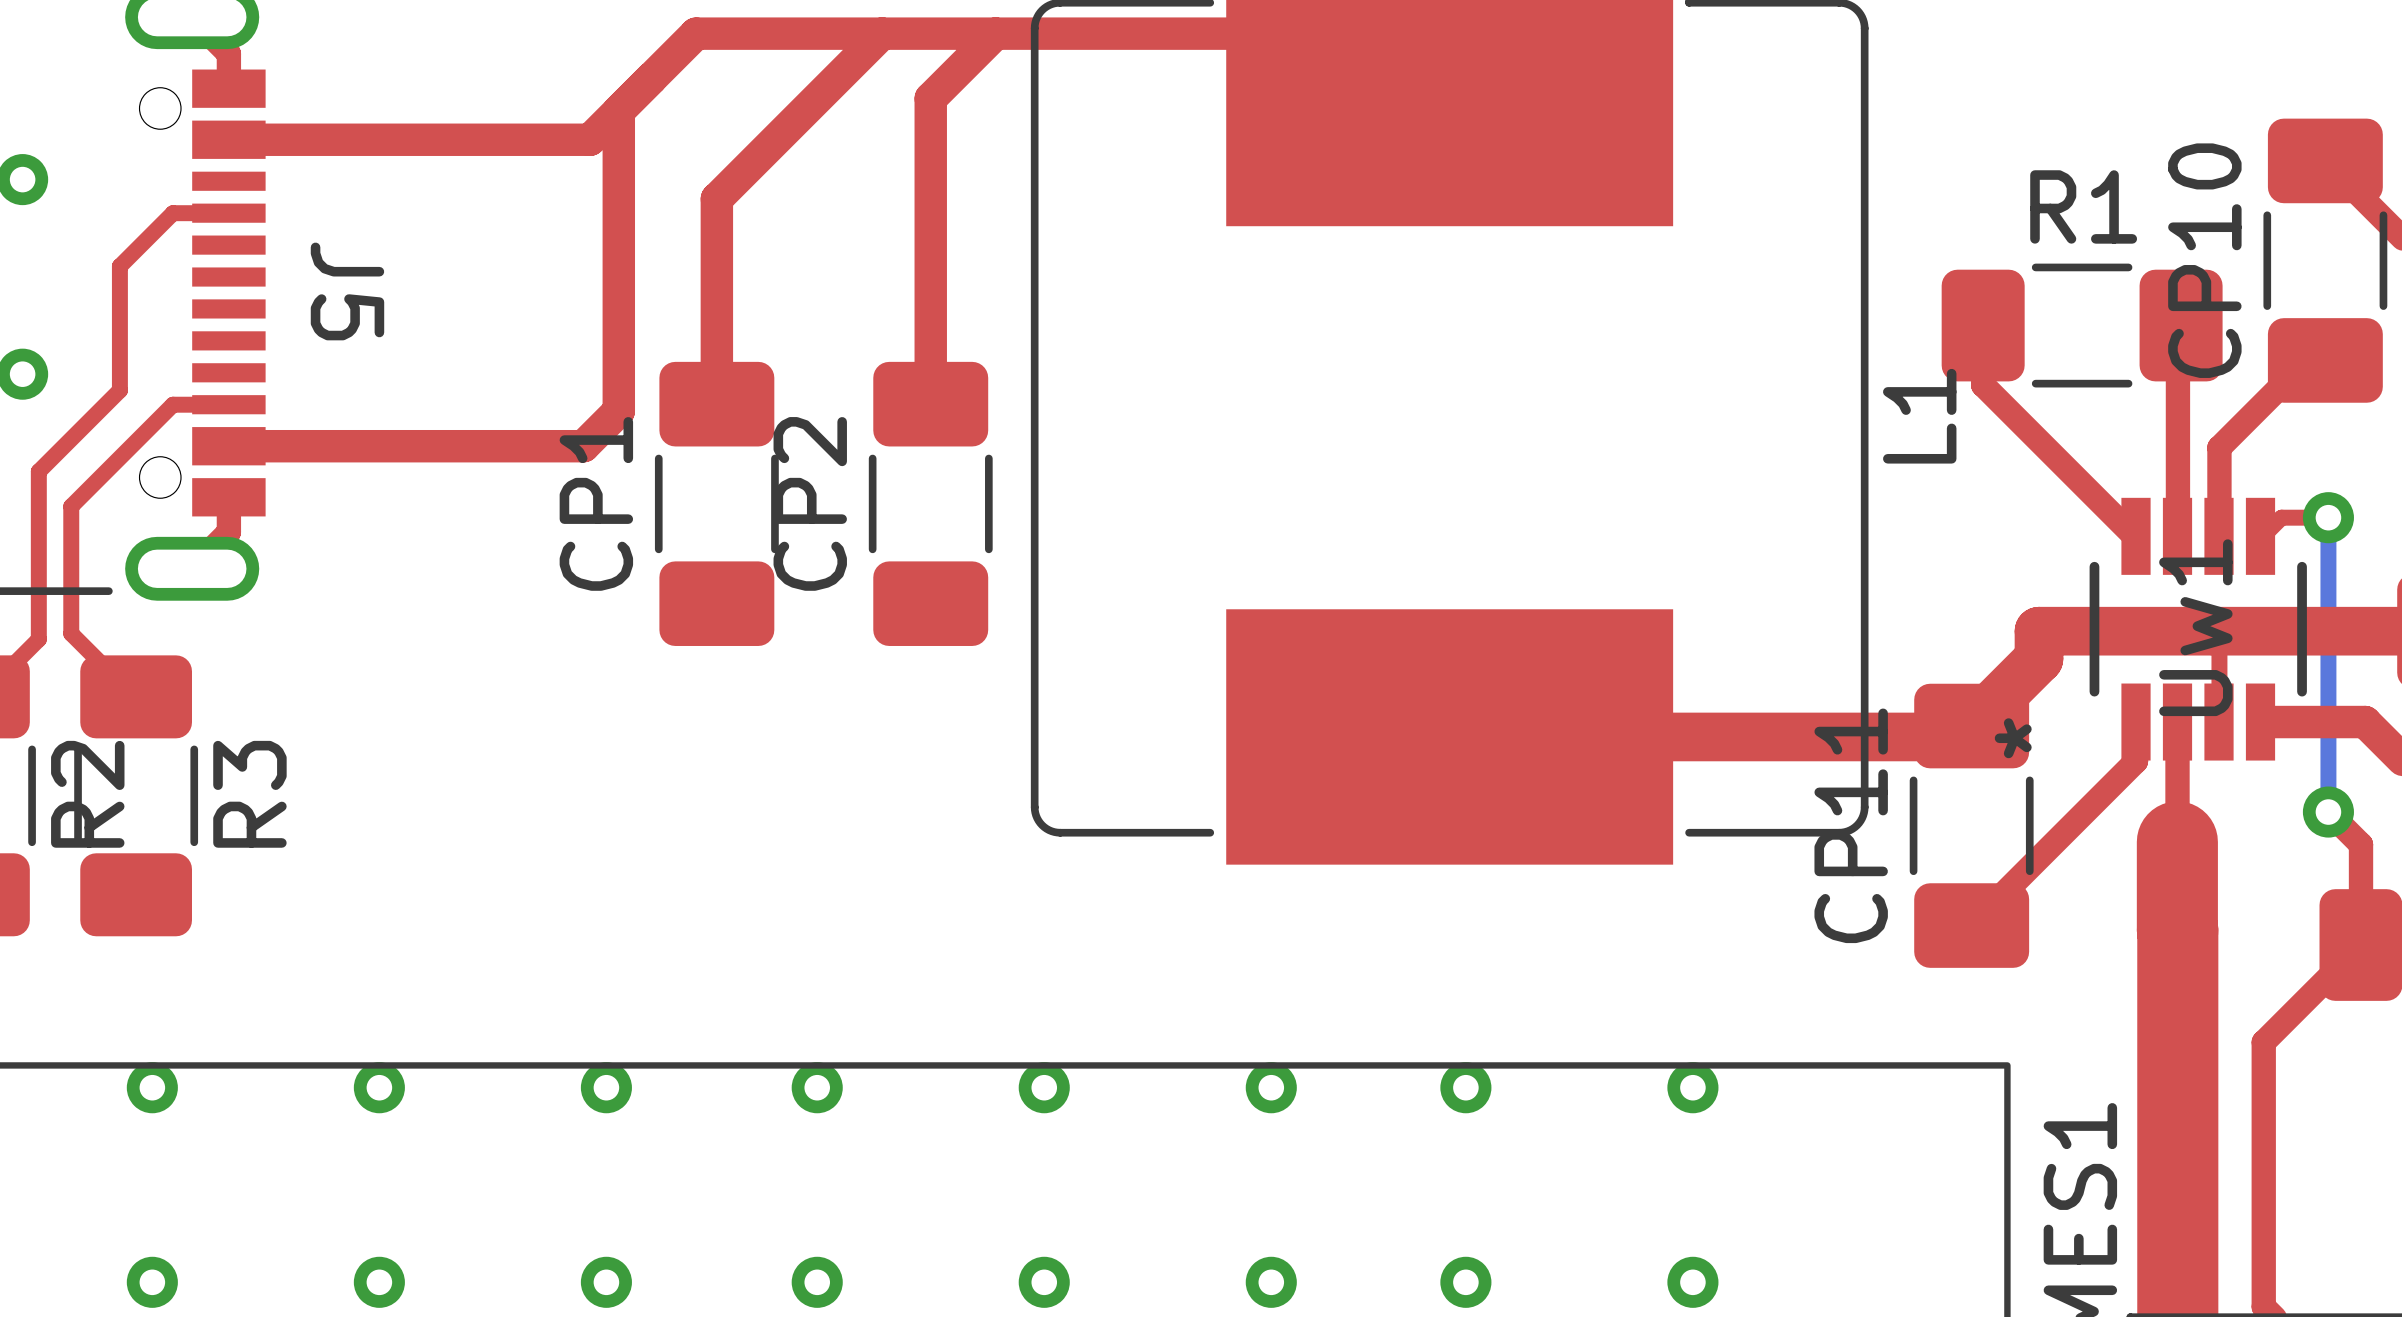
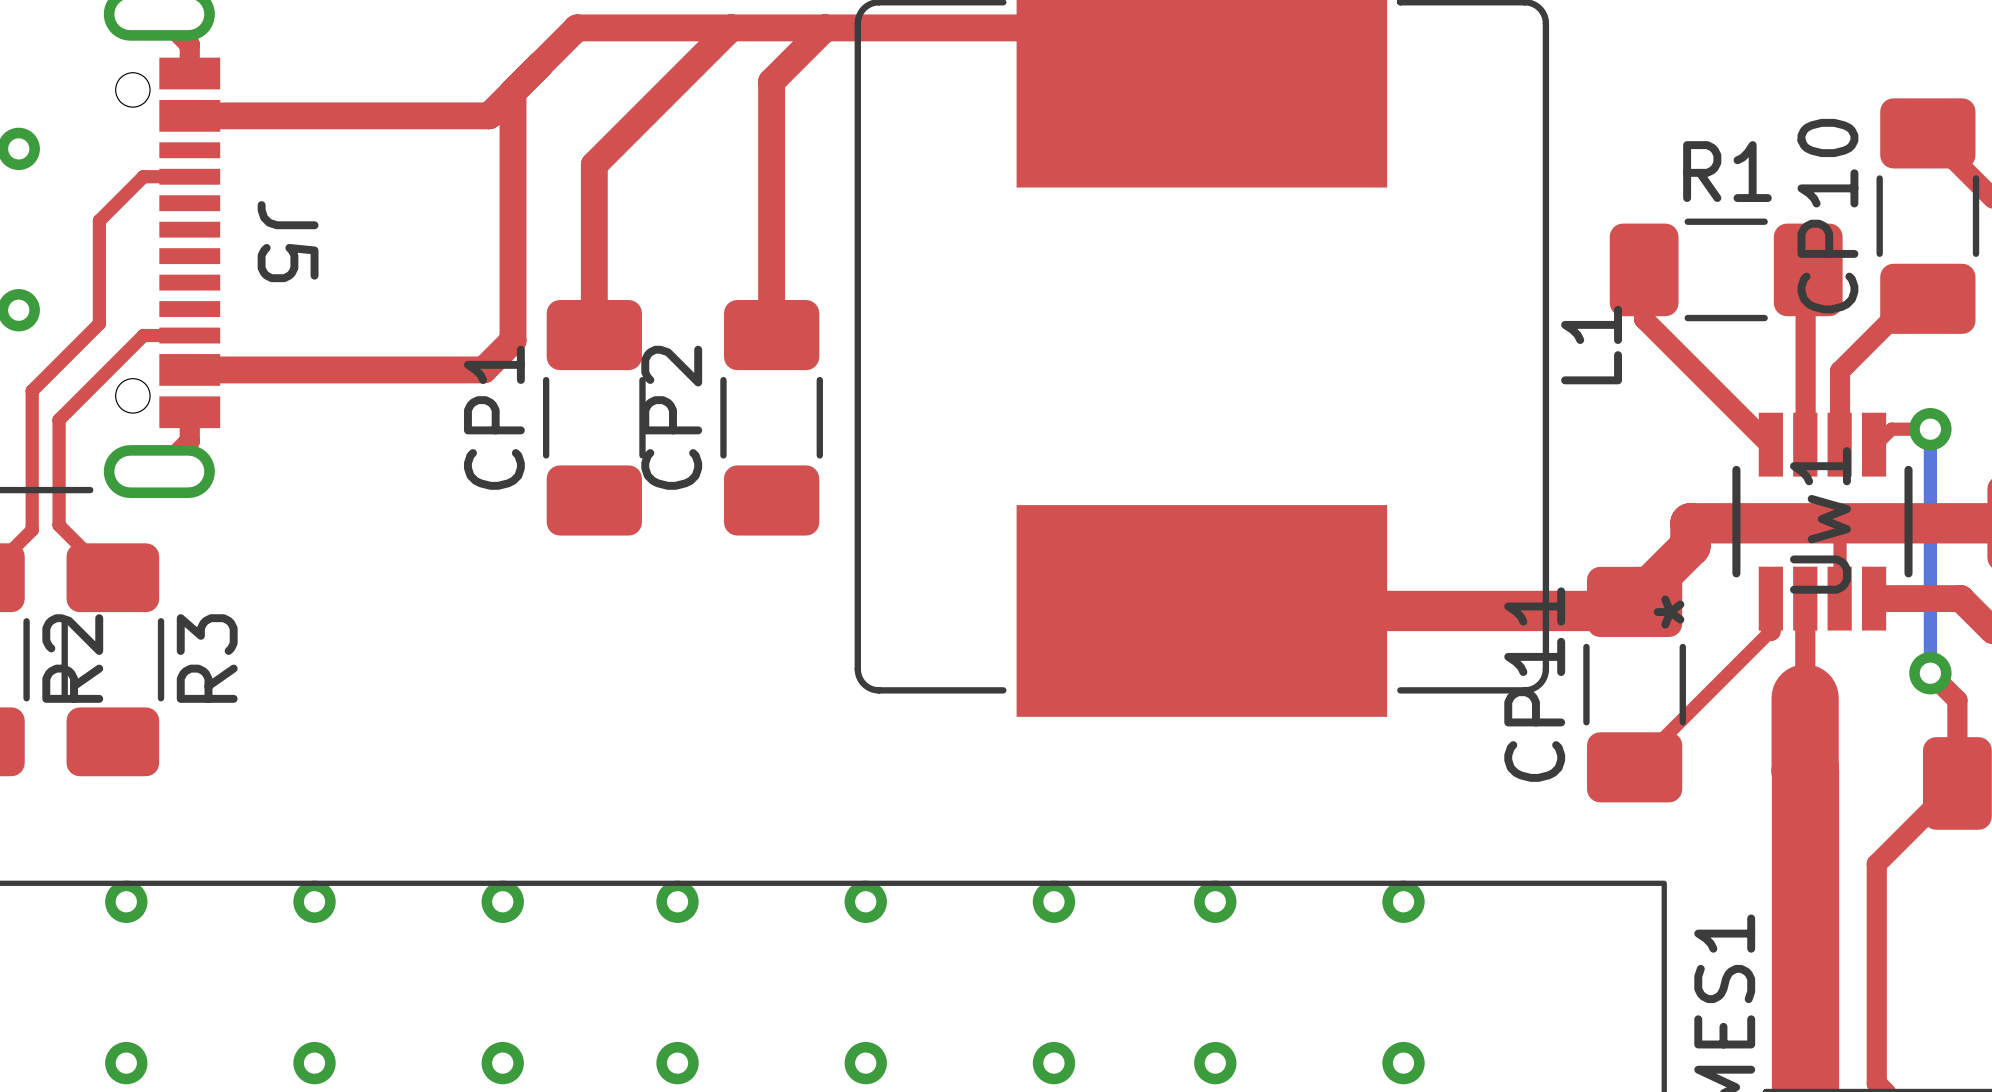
top track width: thick (2136, 761) (1971, 925) -> thin (1770, 631) (1634, 767)

